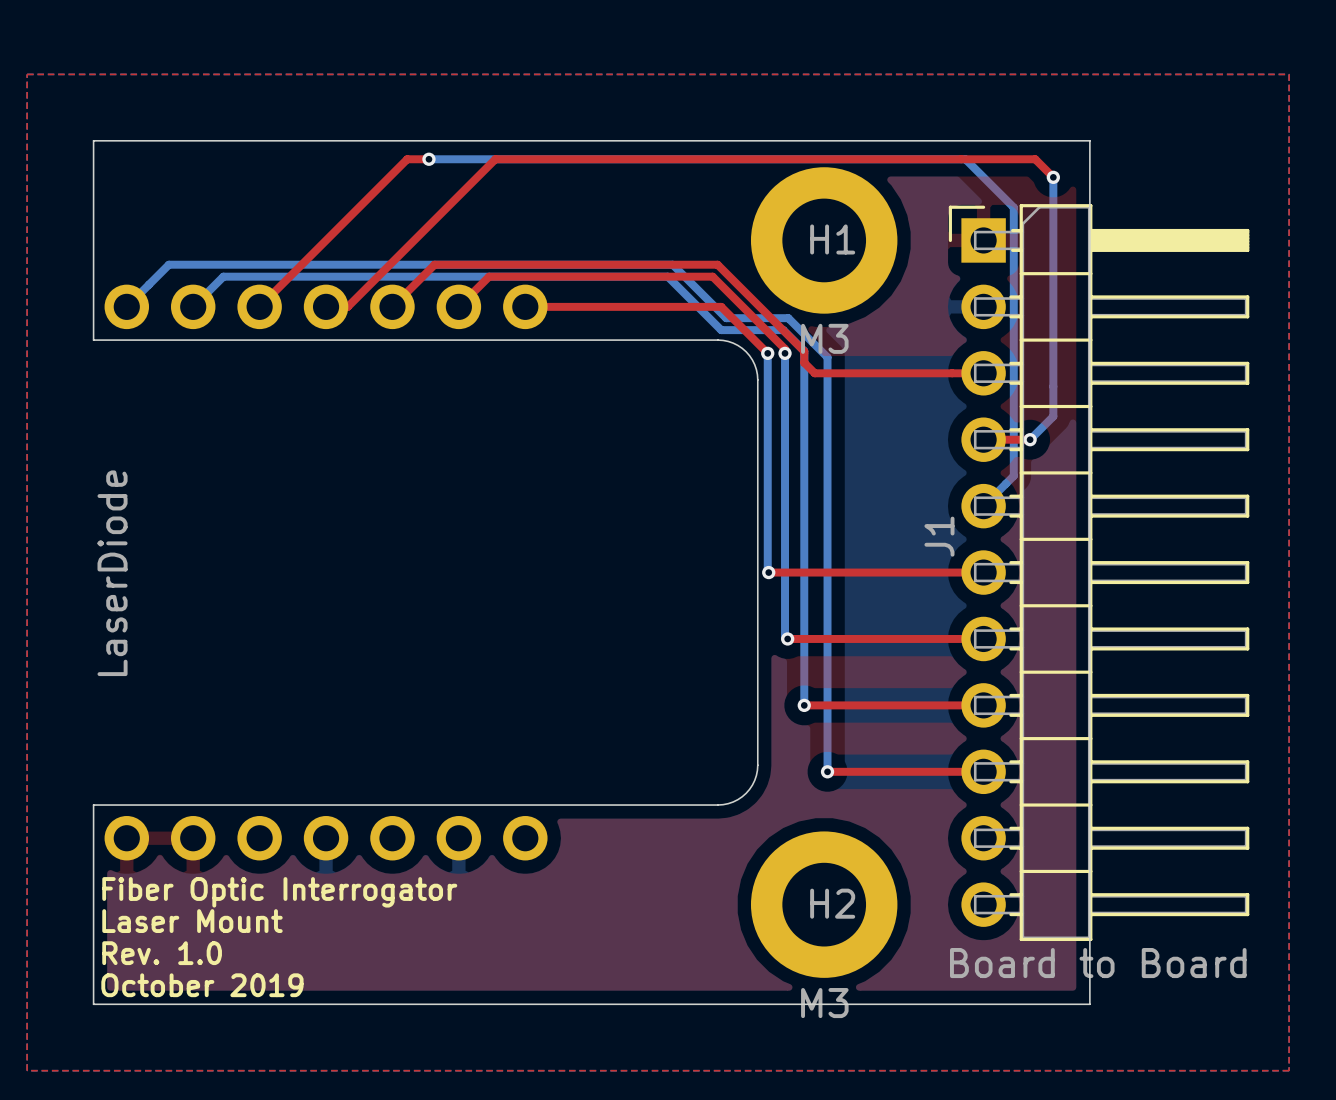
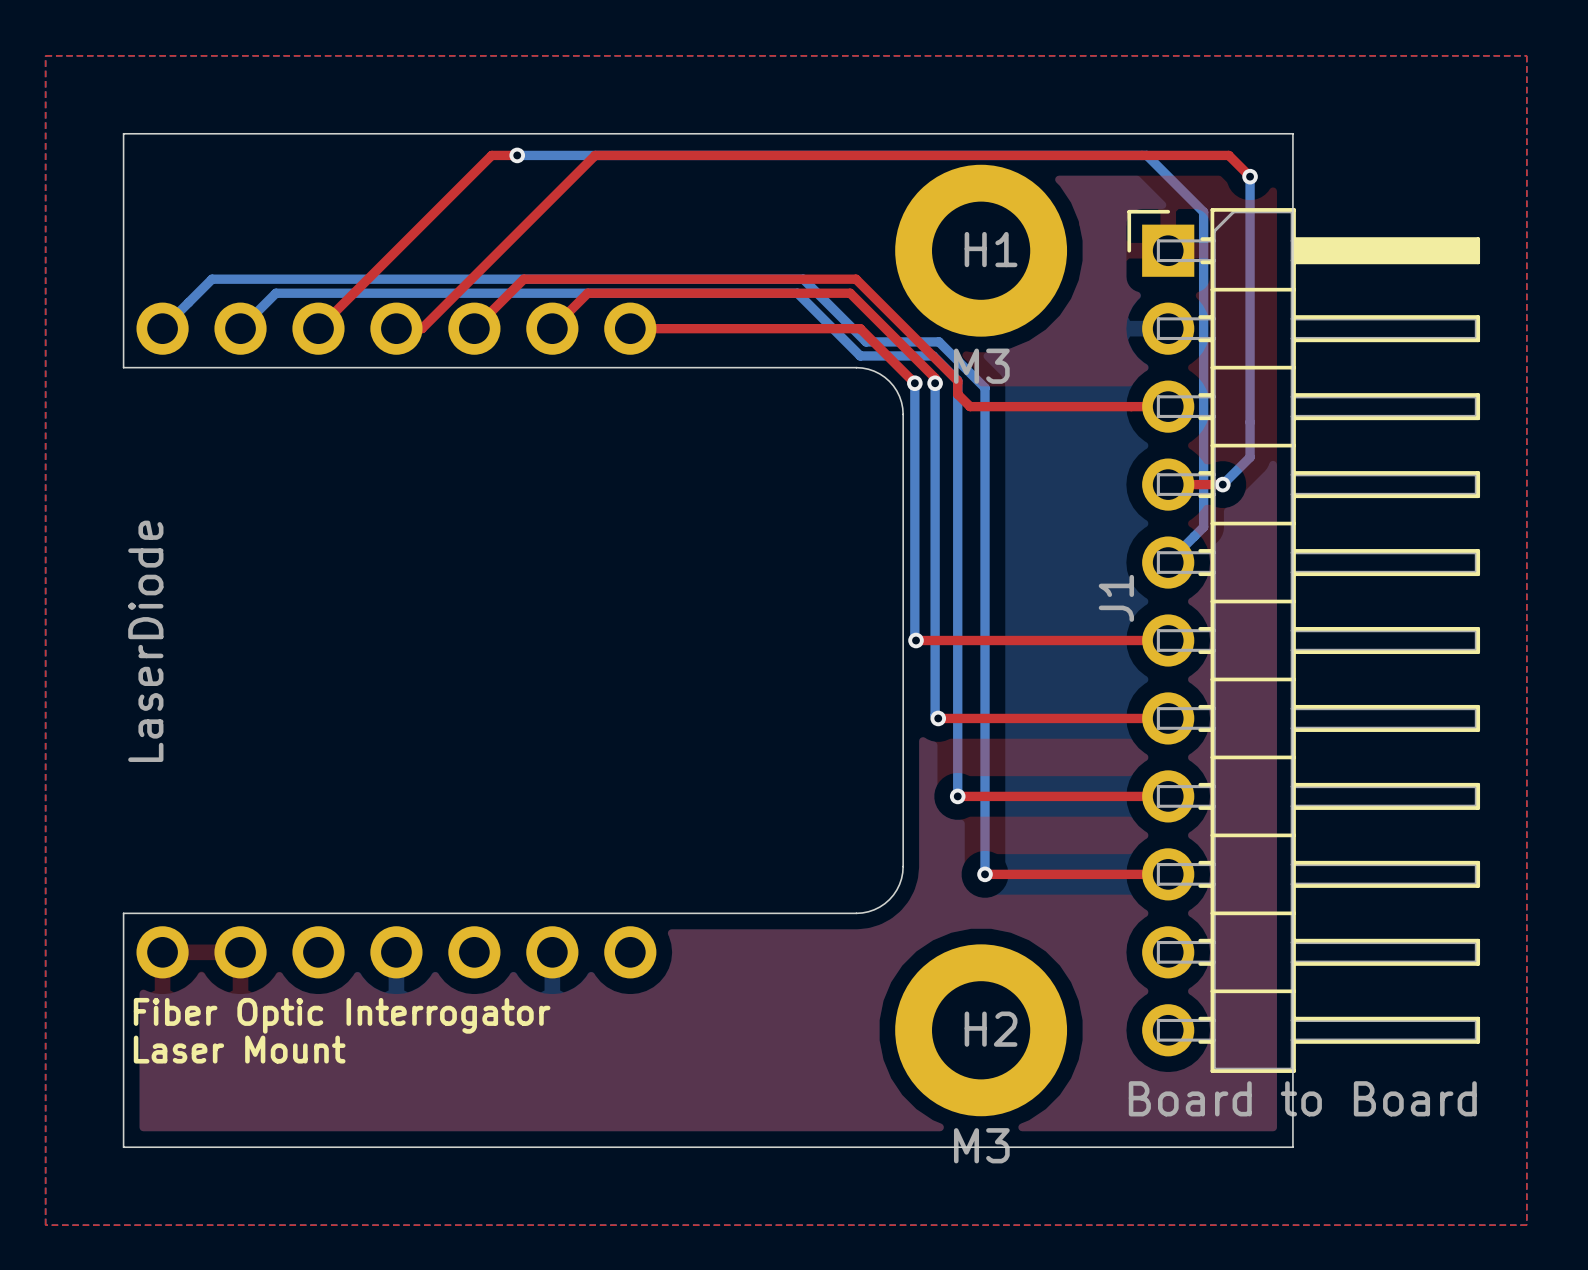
text: Rev. 1.0 (162, 953) -> none
text: October 2019 (202, 985) -> none

